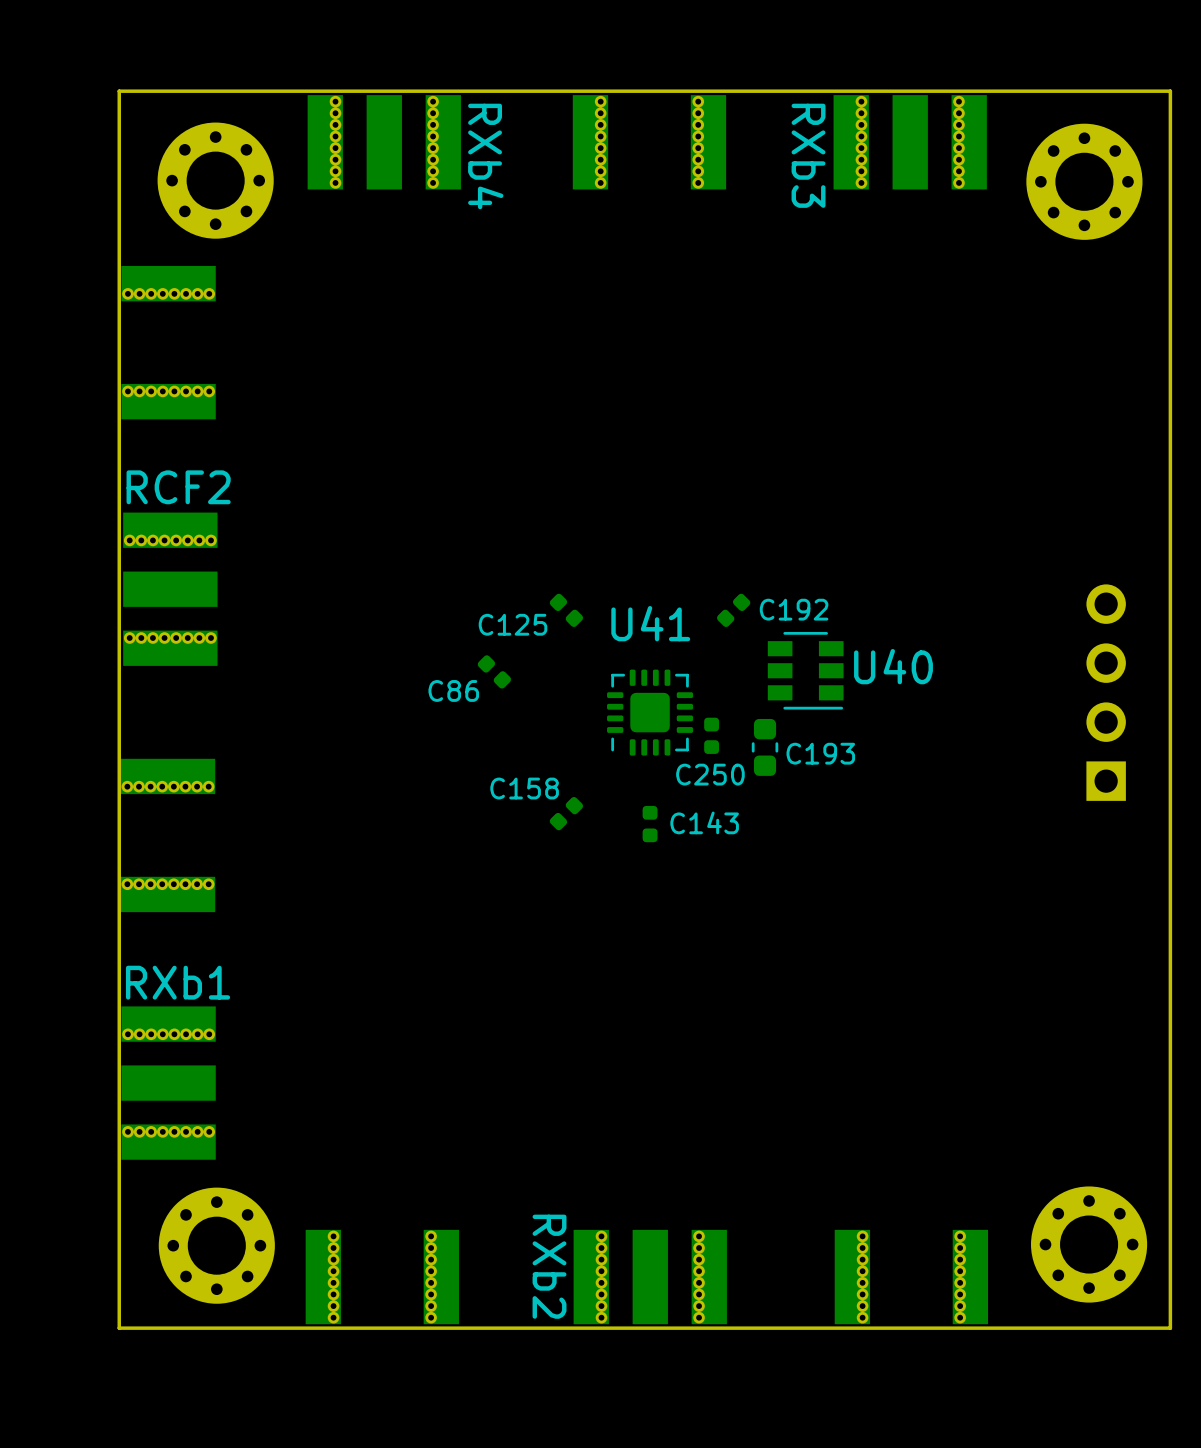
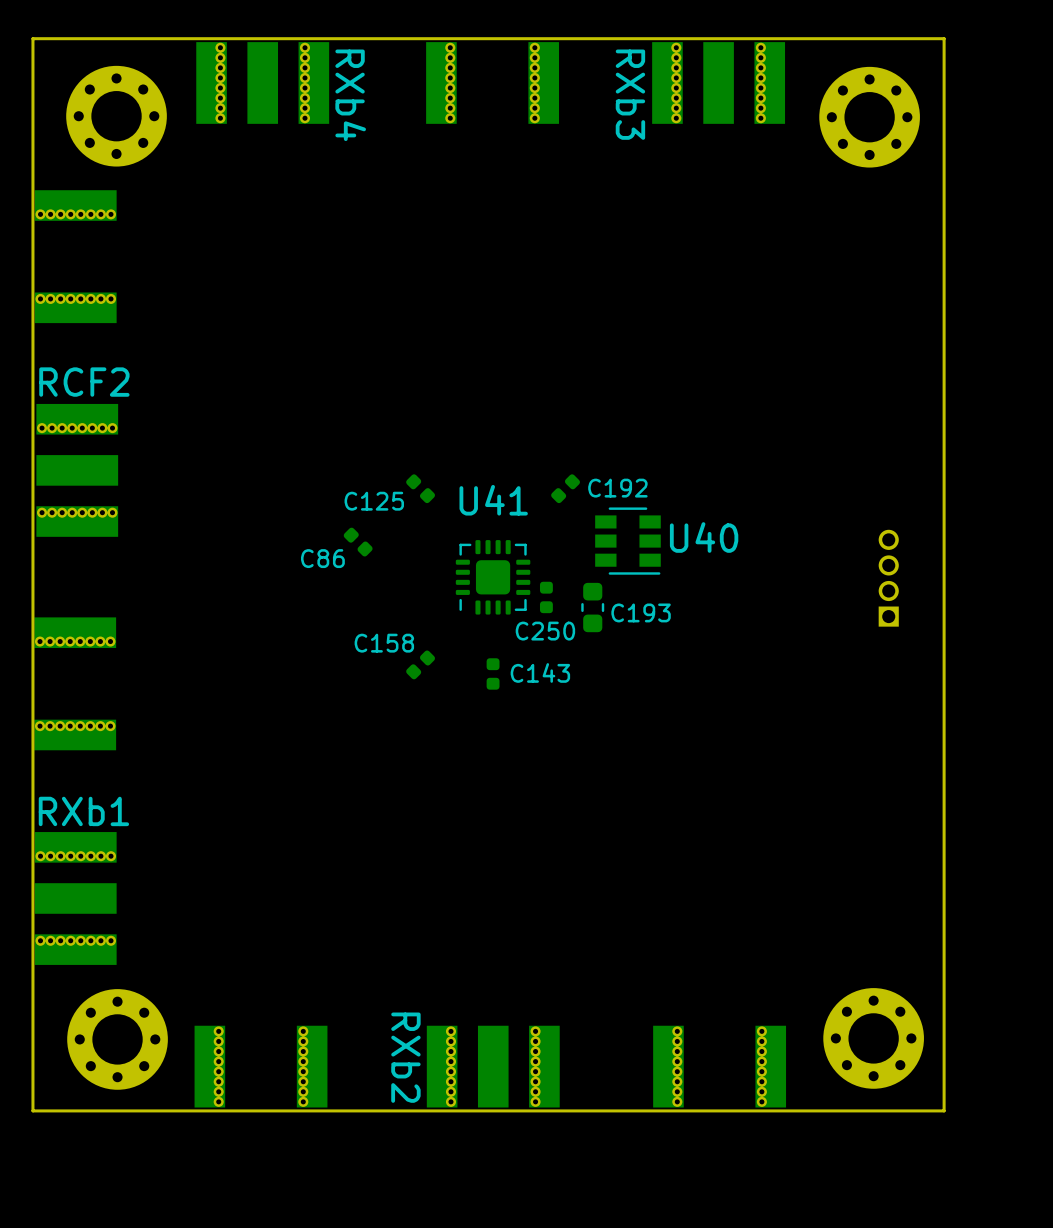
part footprint: [1086, 584, 1126, 801] -> [878, 529, 899, 627]

